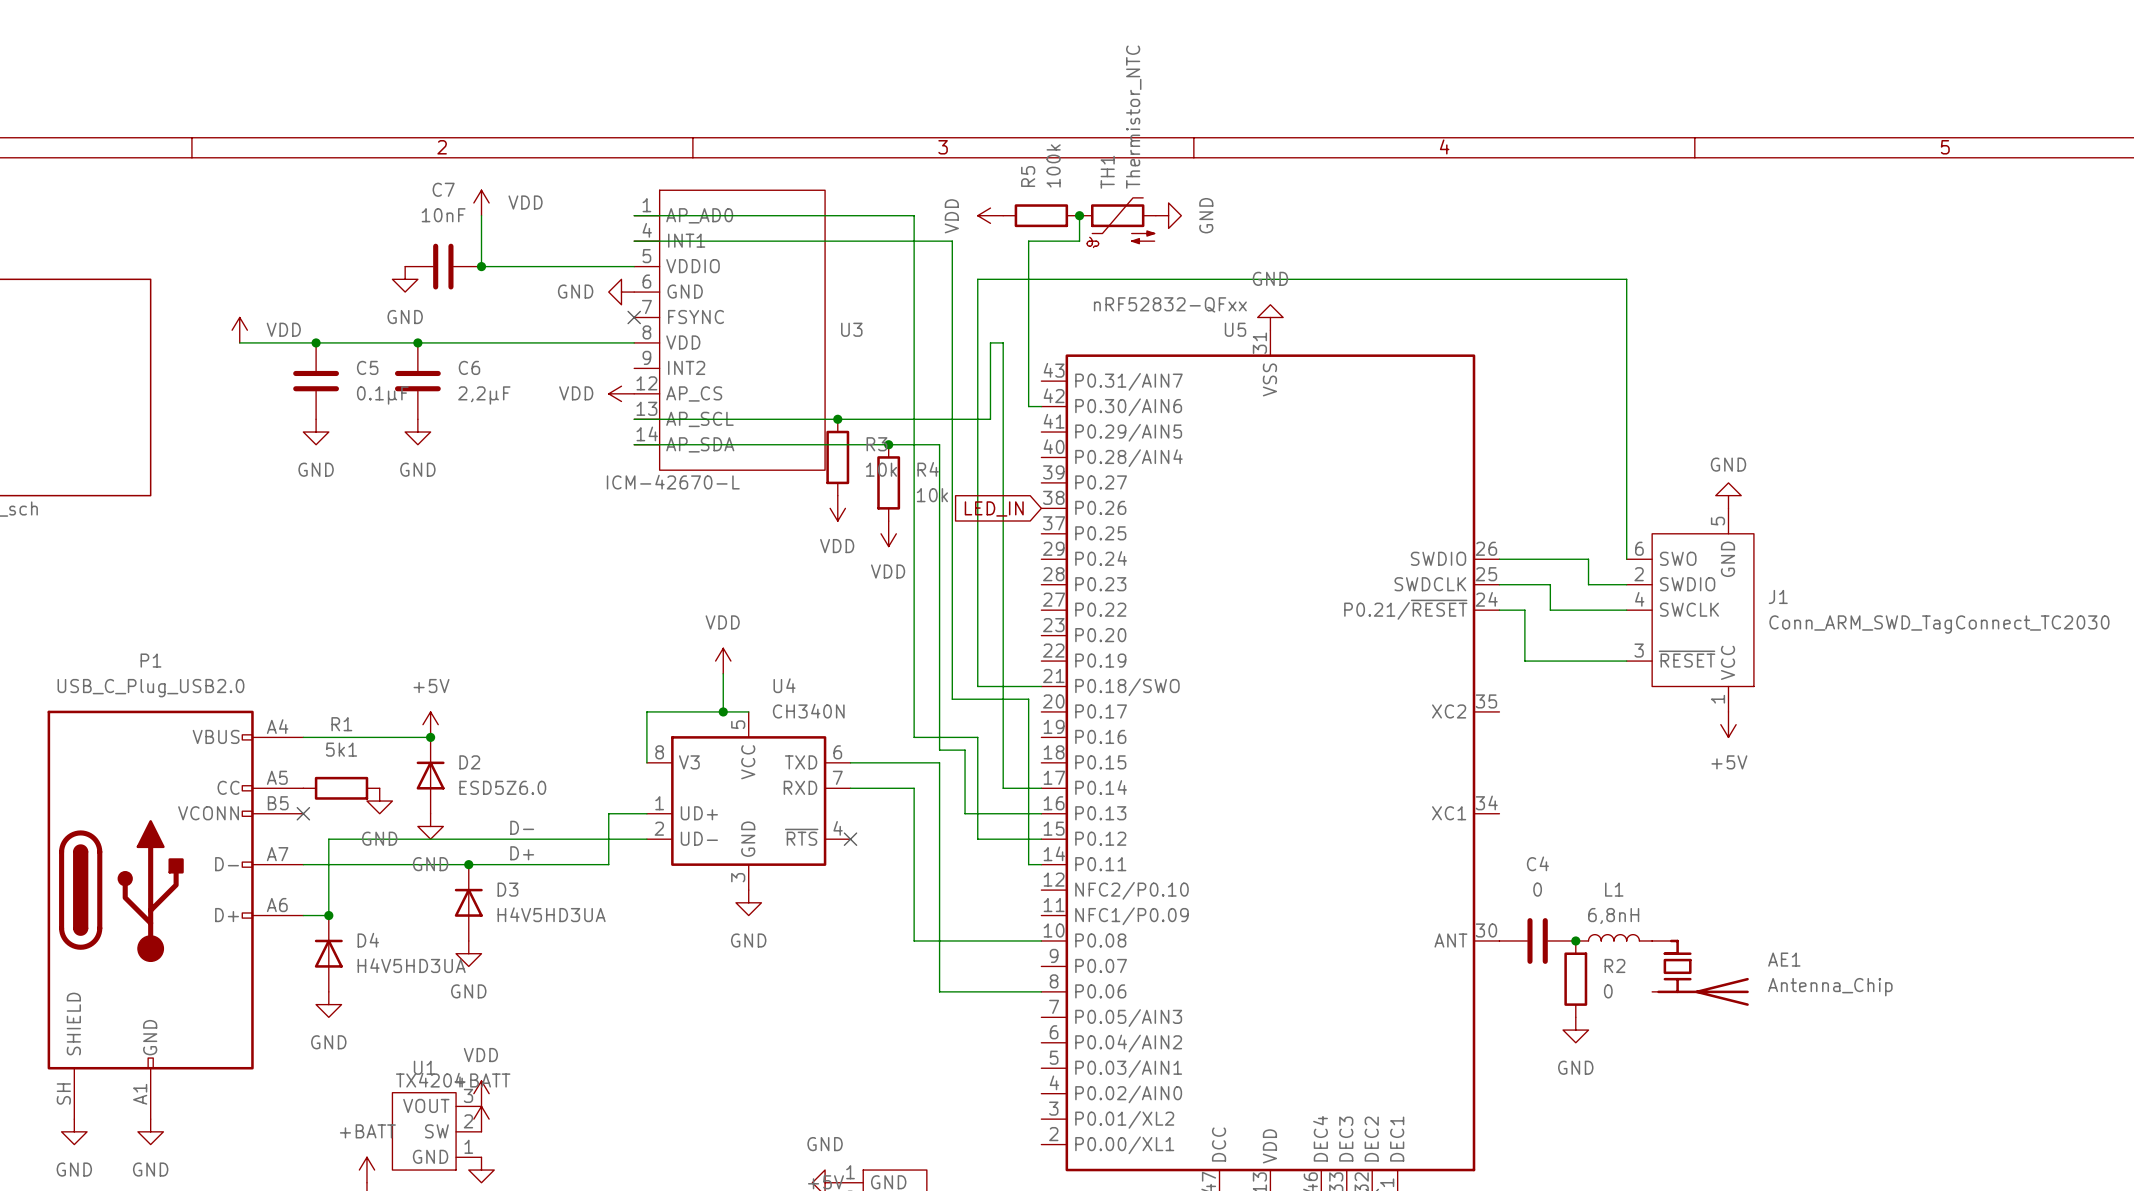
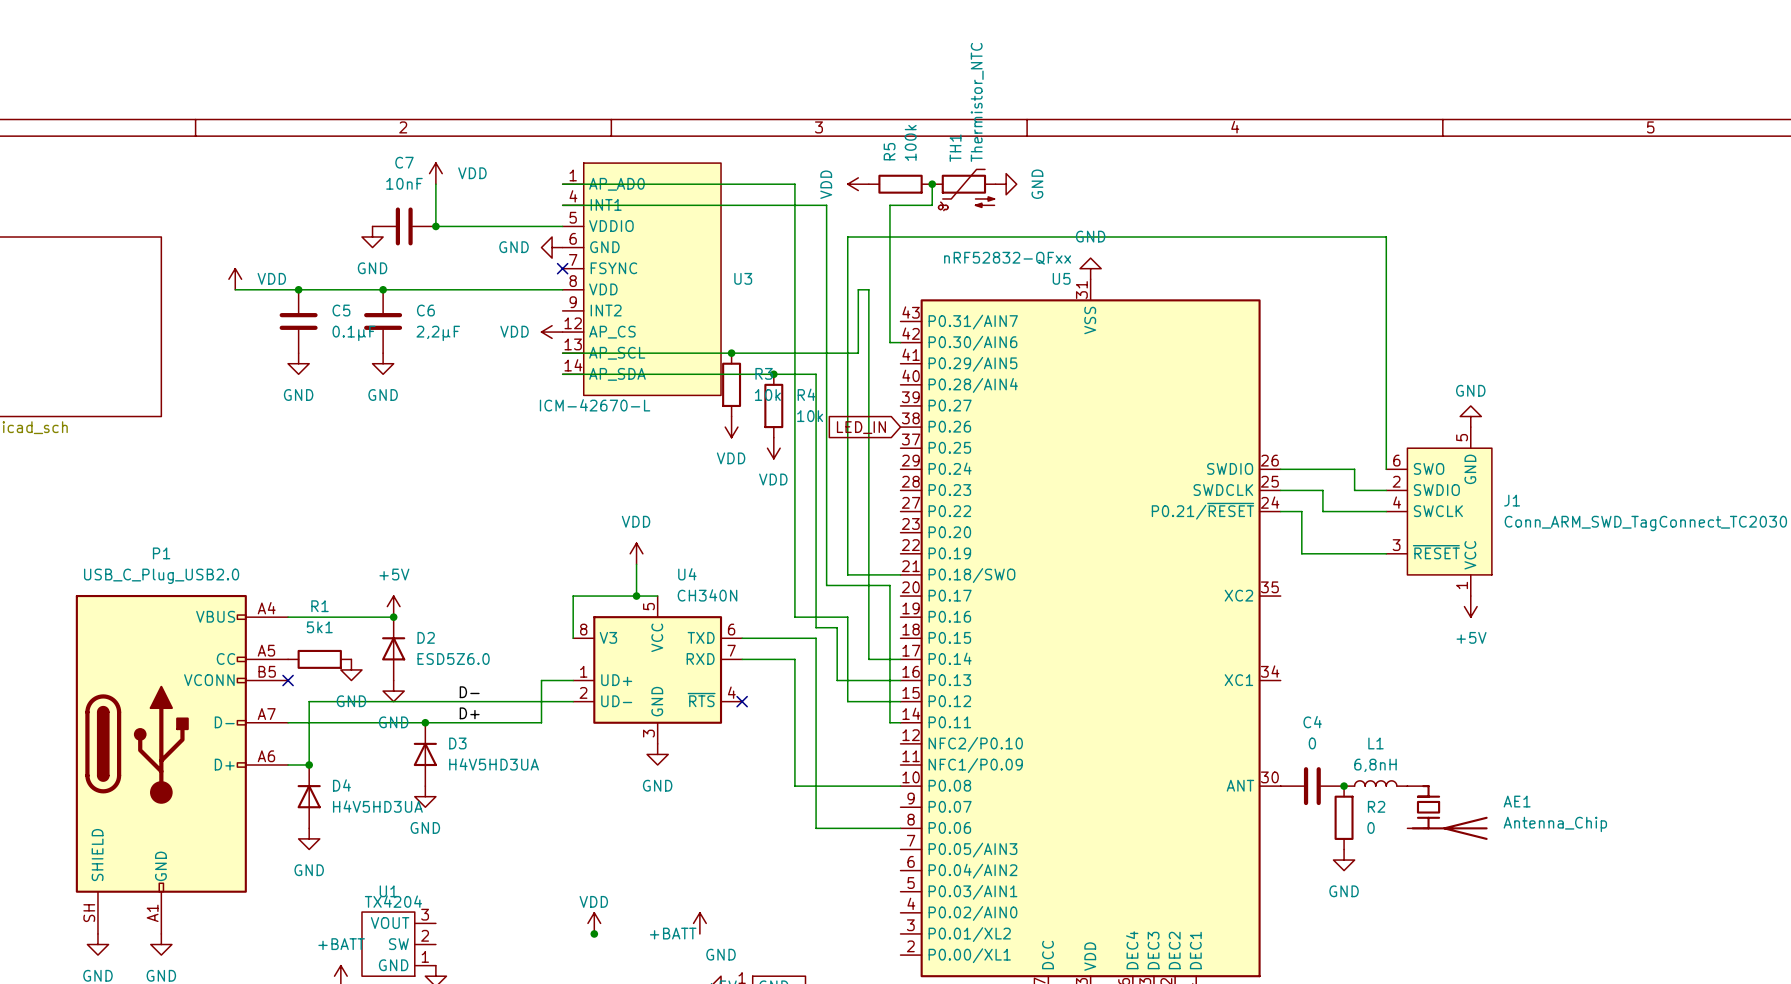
power symbol text position: VDD (480, 1055) -> VDD (593, 901)
power symbol position: VDD (481, 1093) -> VDD (594, 923)
power symbol: none -> +BATT (699, 923)
power symbol: +BATT (481, 1119) -> none
junction: none -> (594, 933)

